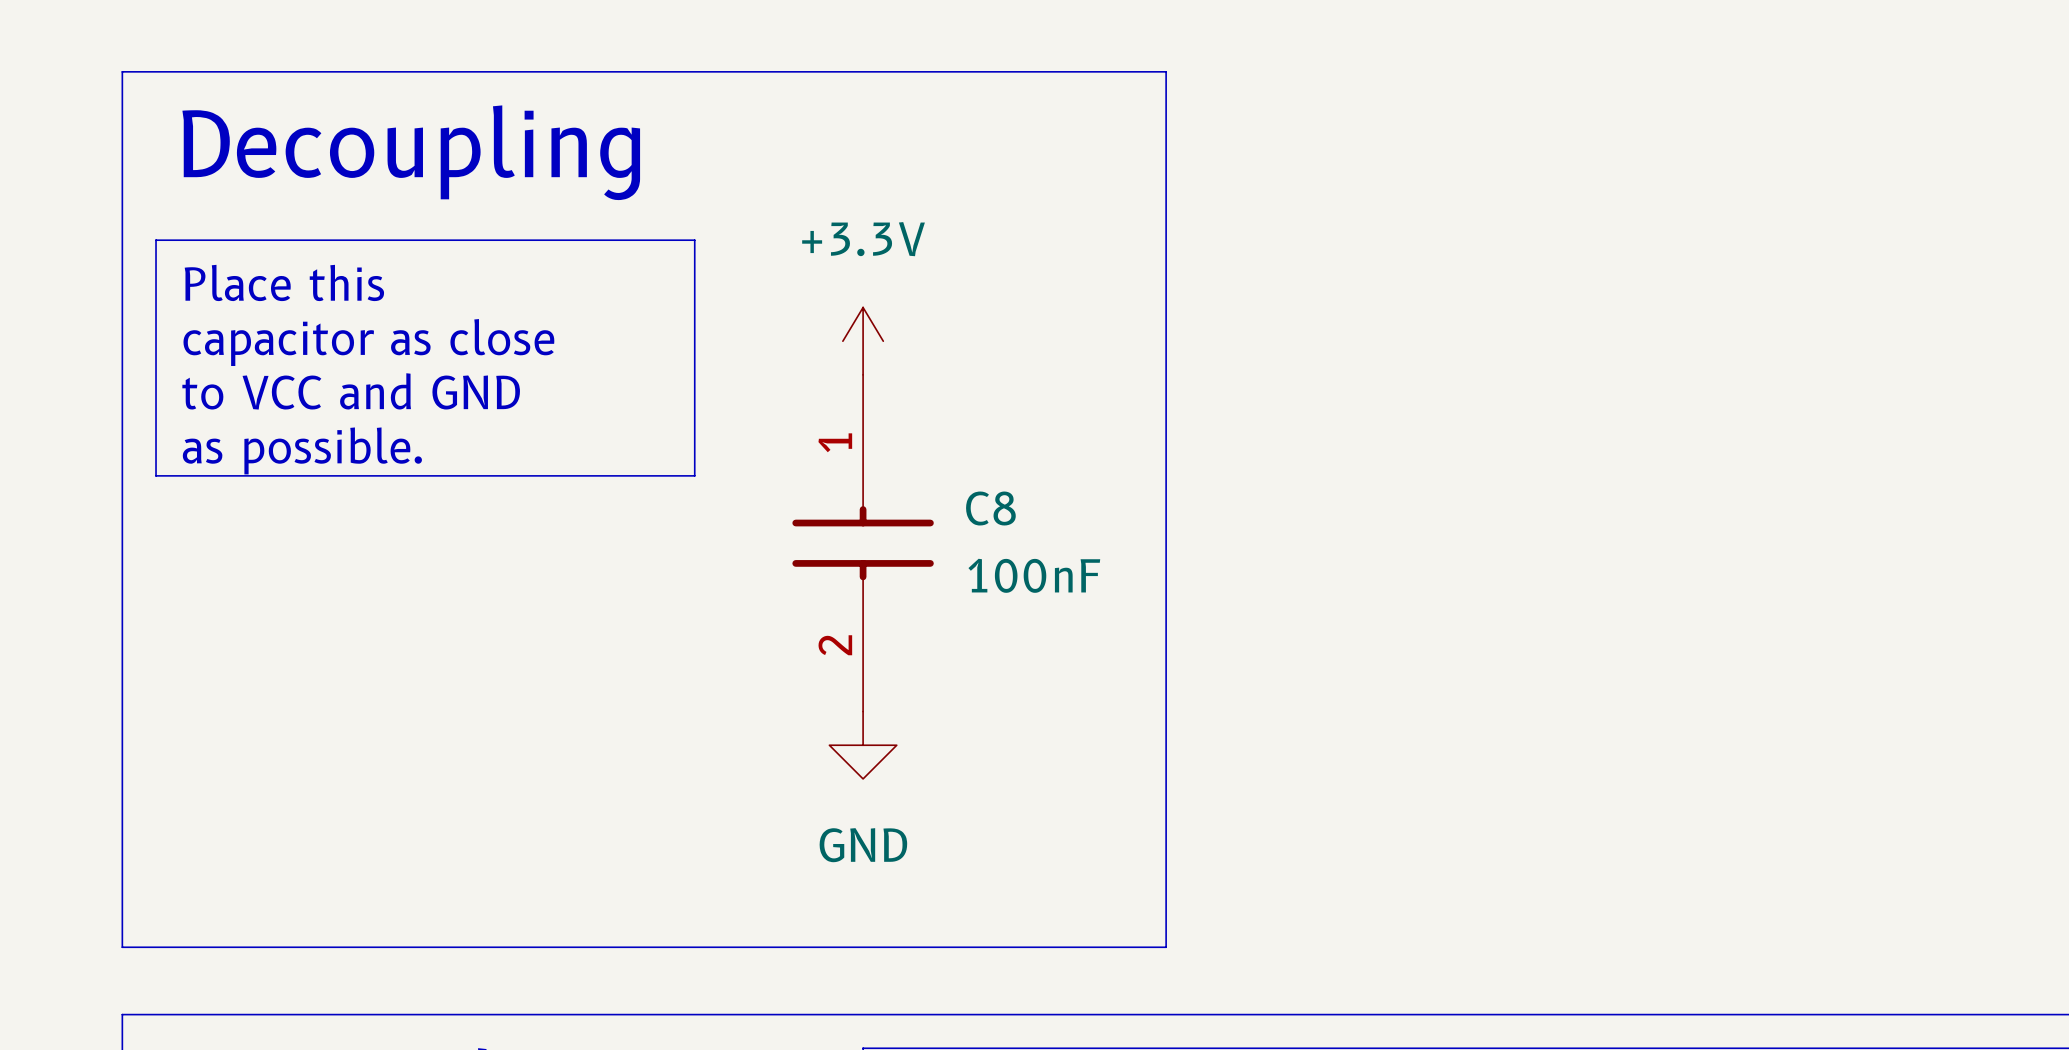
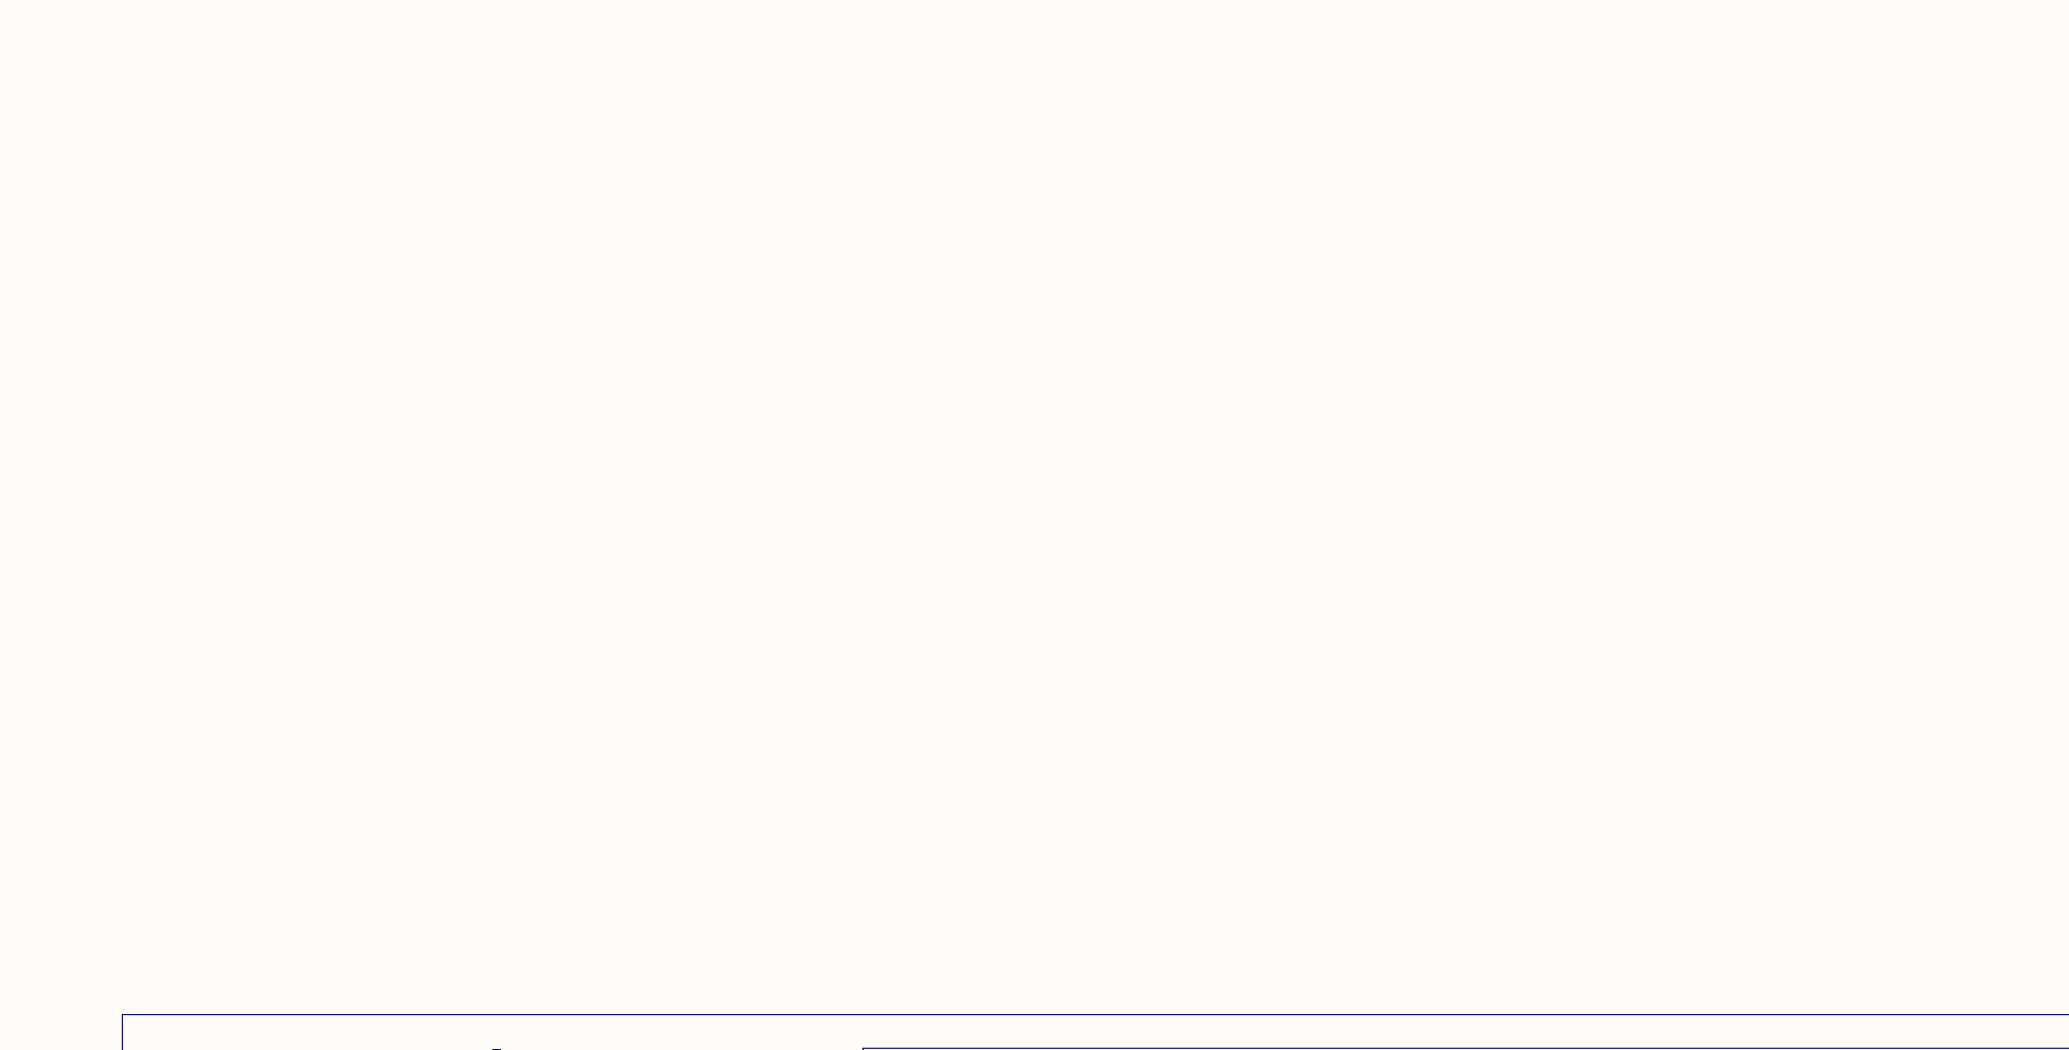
line: (122, 71) (1166, 71) (1166, 947) (122, 947) (122, 71) -> none
text: Decoupling (411, 152) -> none
line: (156, 240) (694, 240) (694, 475) (156, 475) (156, 240) -> none
text: Place this (284, 282) -> none
power symbol: +3.3V (863, 341) -> none
text: capacitor as close (368, 342) -> none
text: to VCC and GND (351, 391) -> none
text: as possible. (302, 450) -> none
C8: 100nF (863, 543) -> none
power symbol: GND (863, 745) -> none

